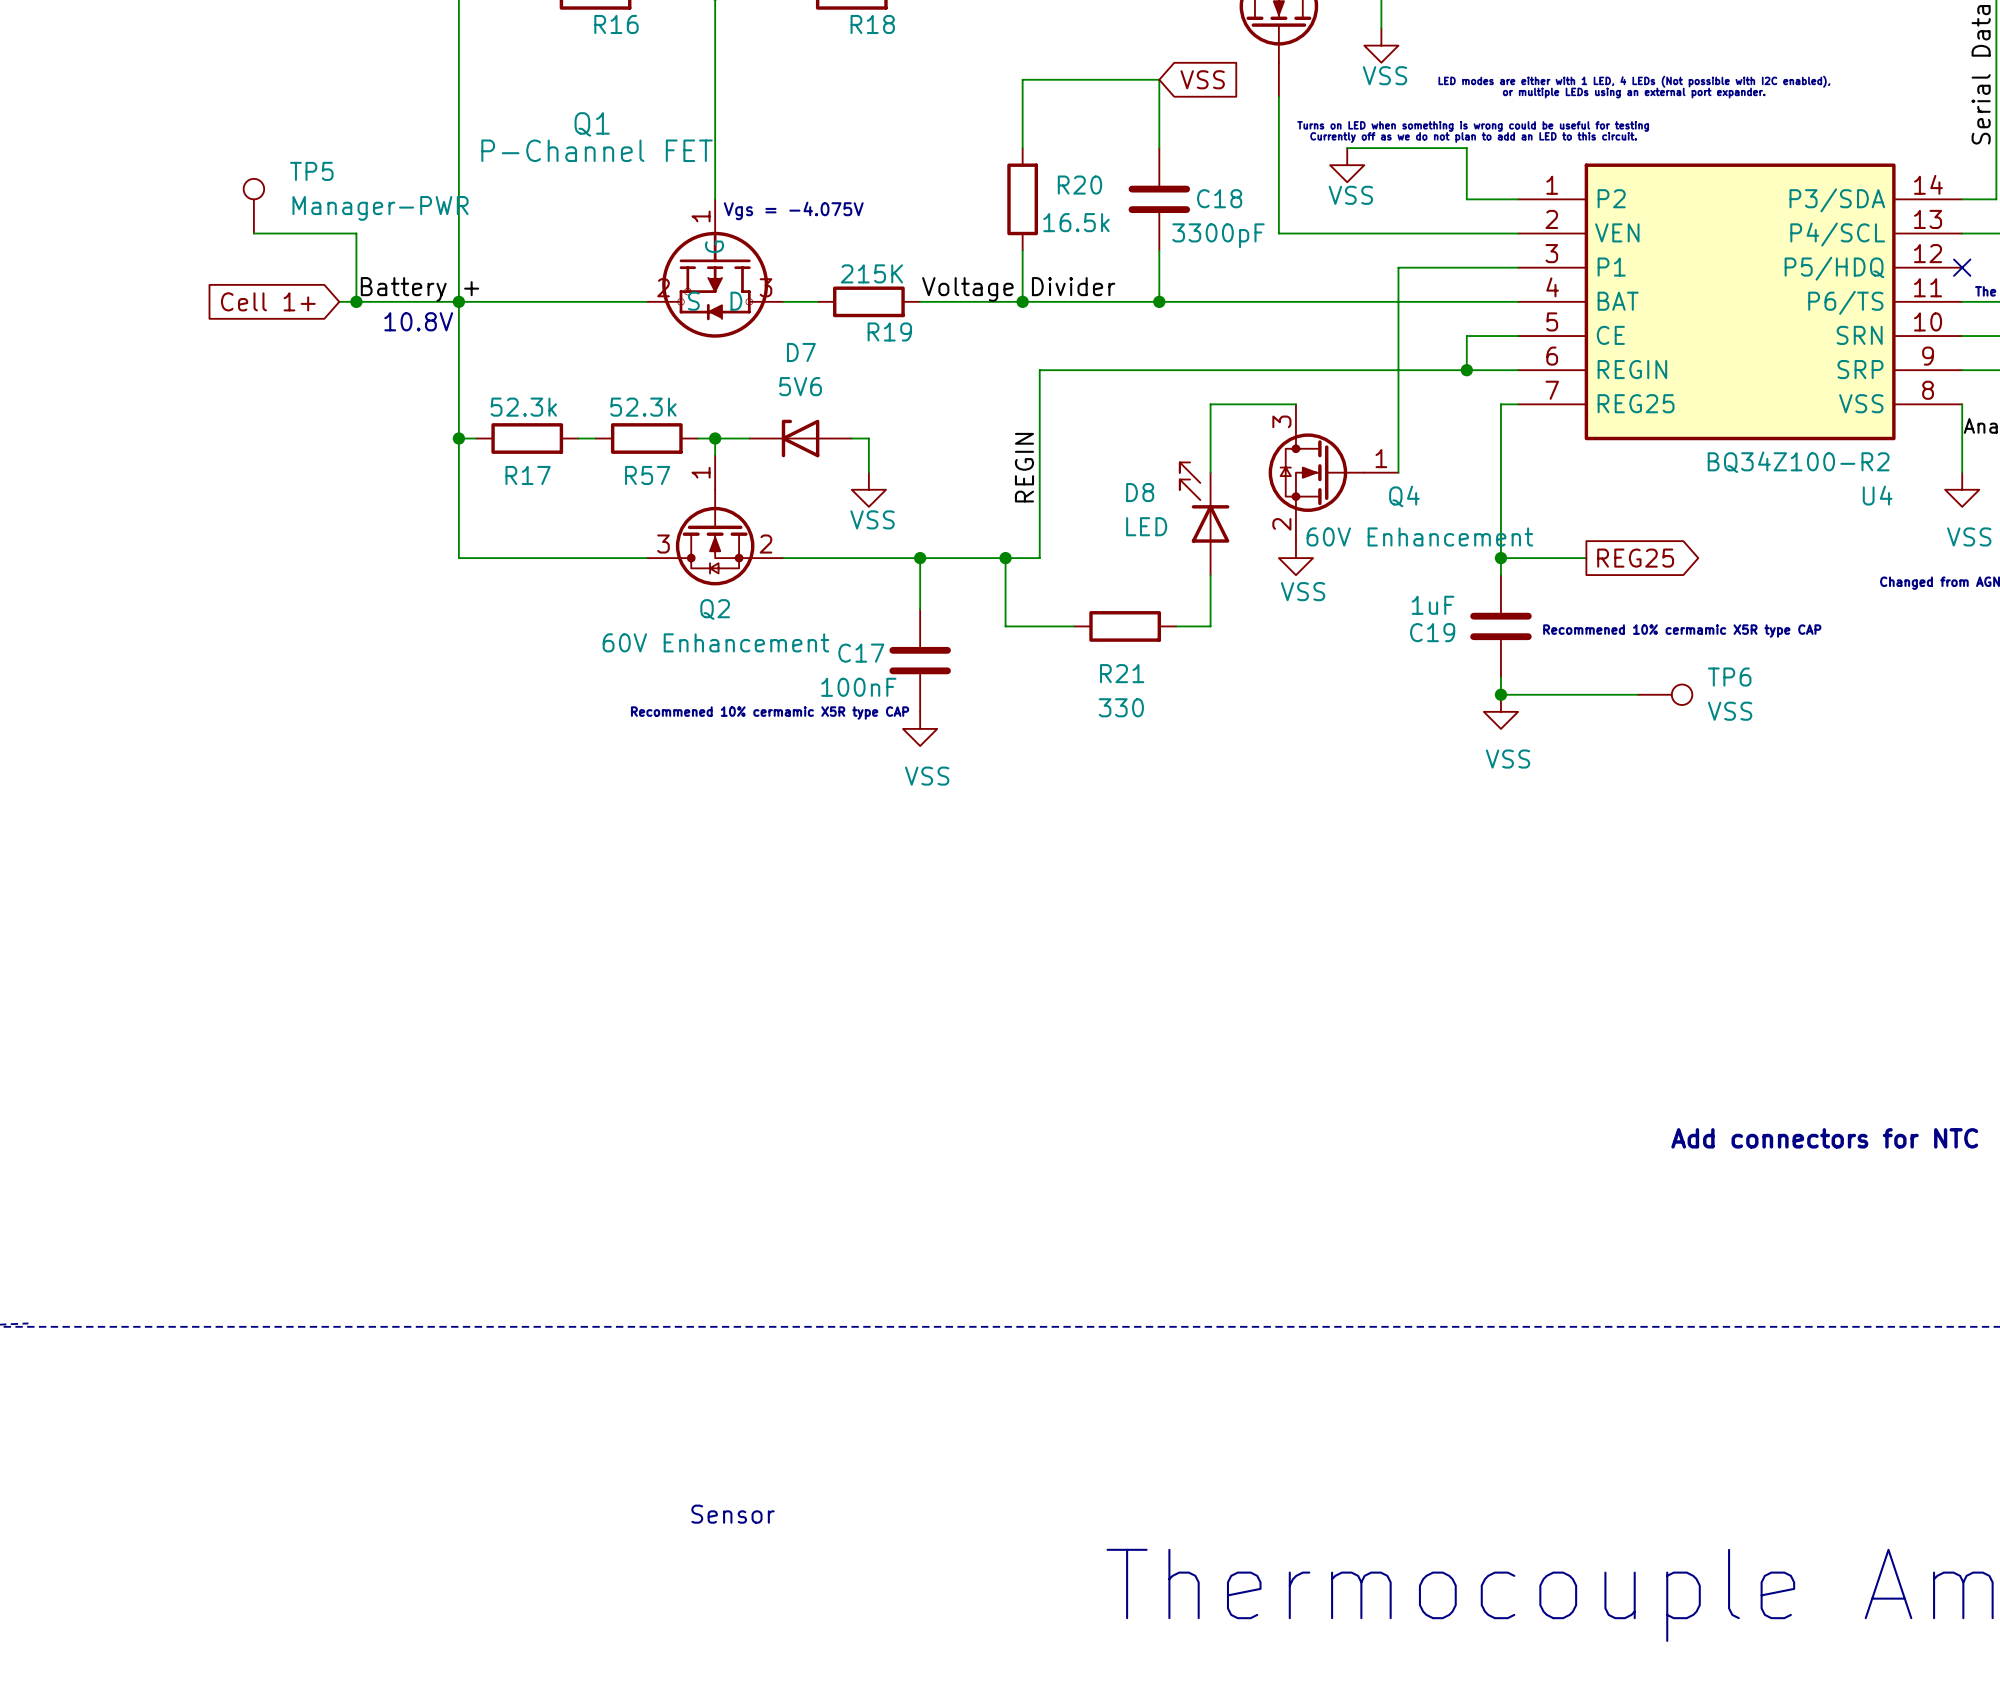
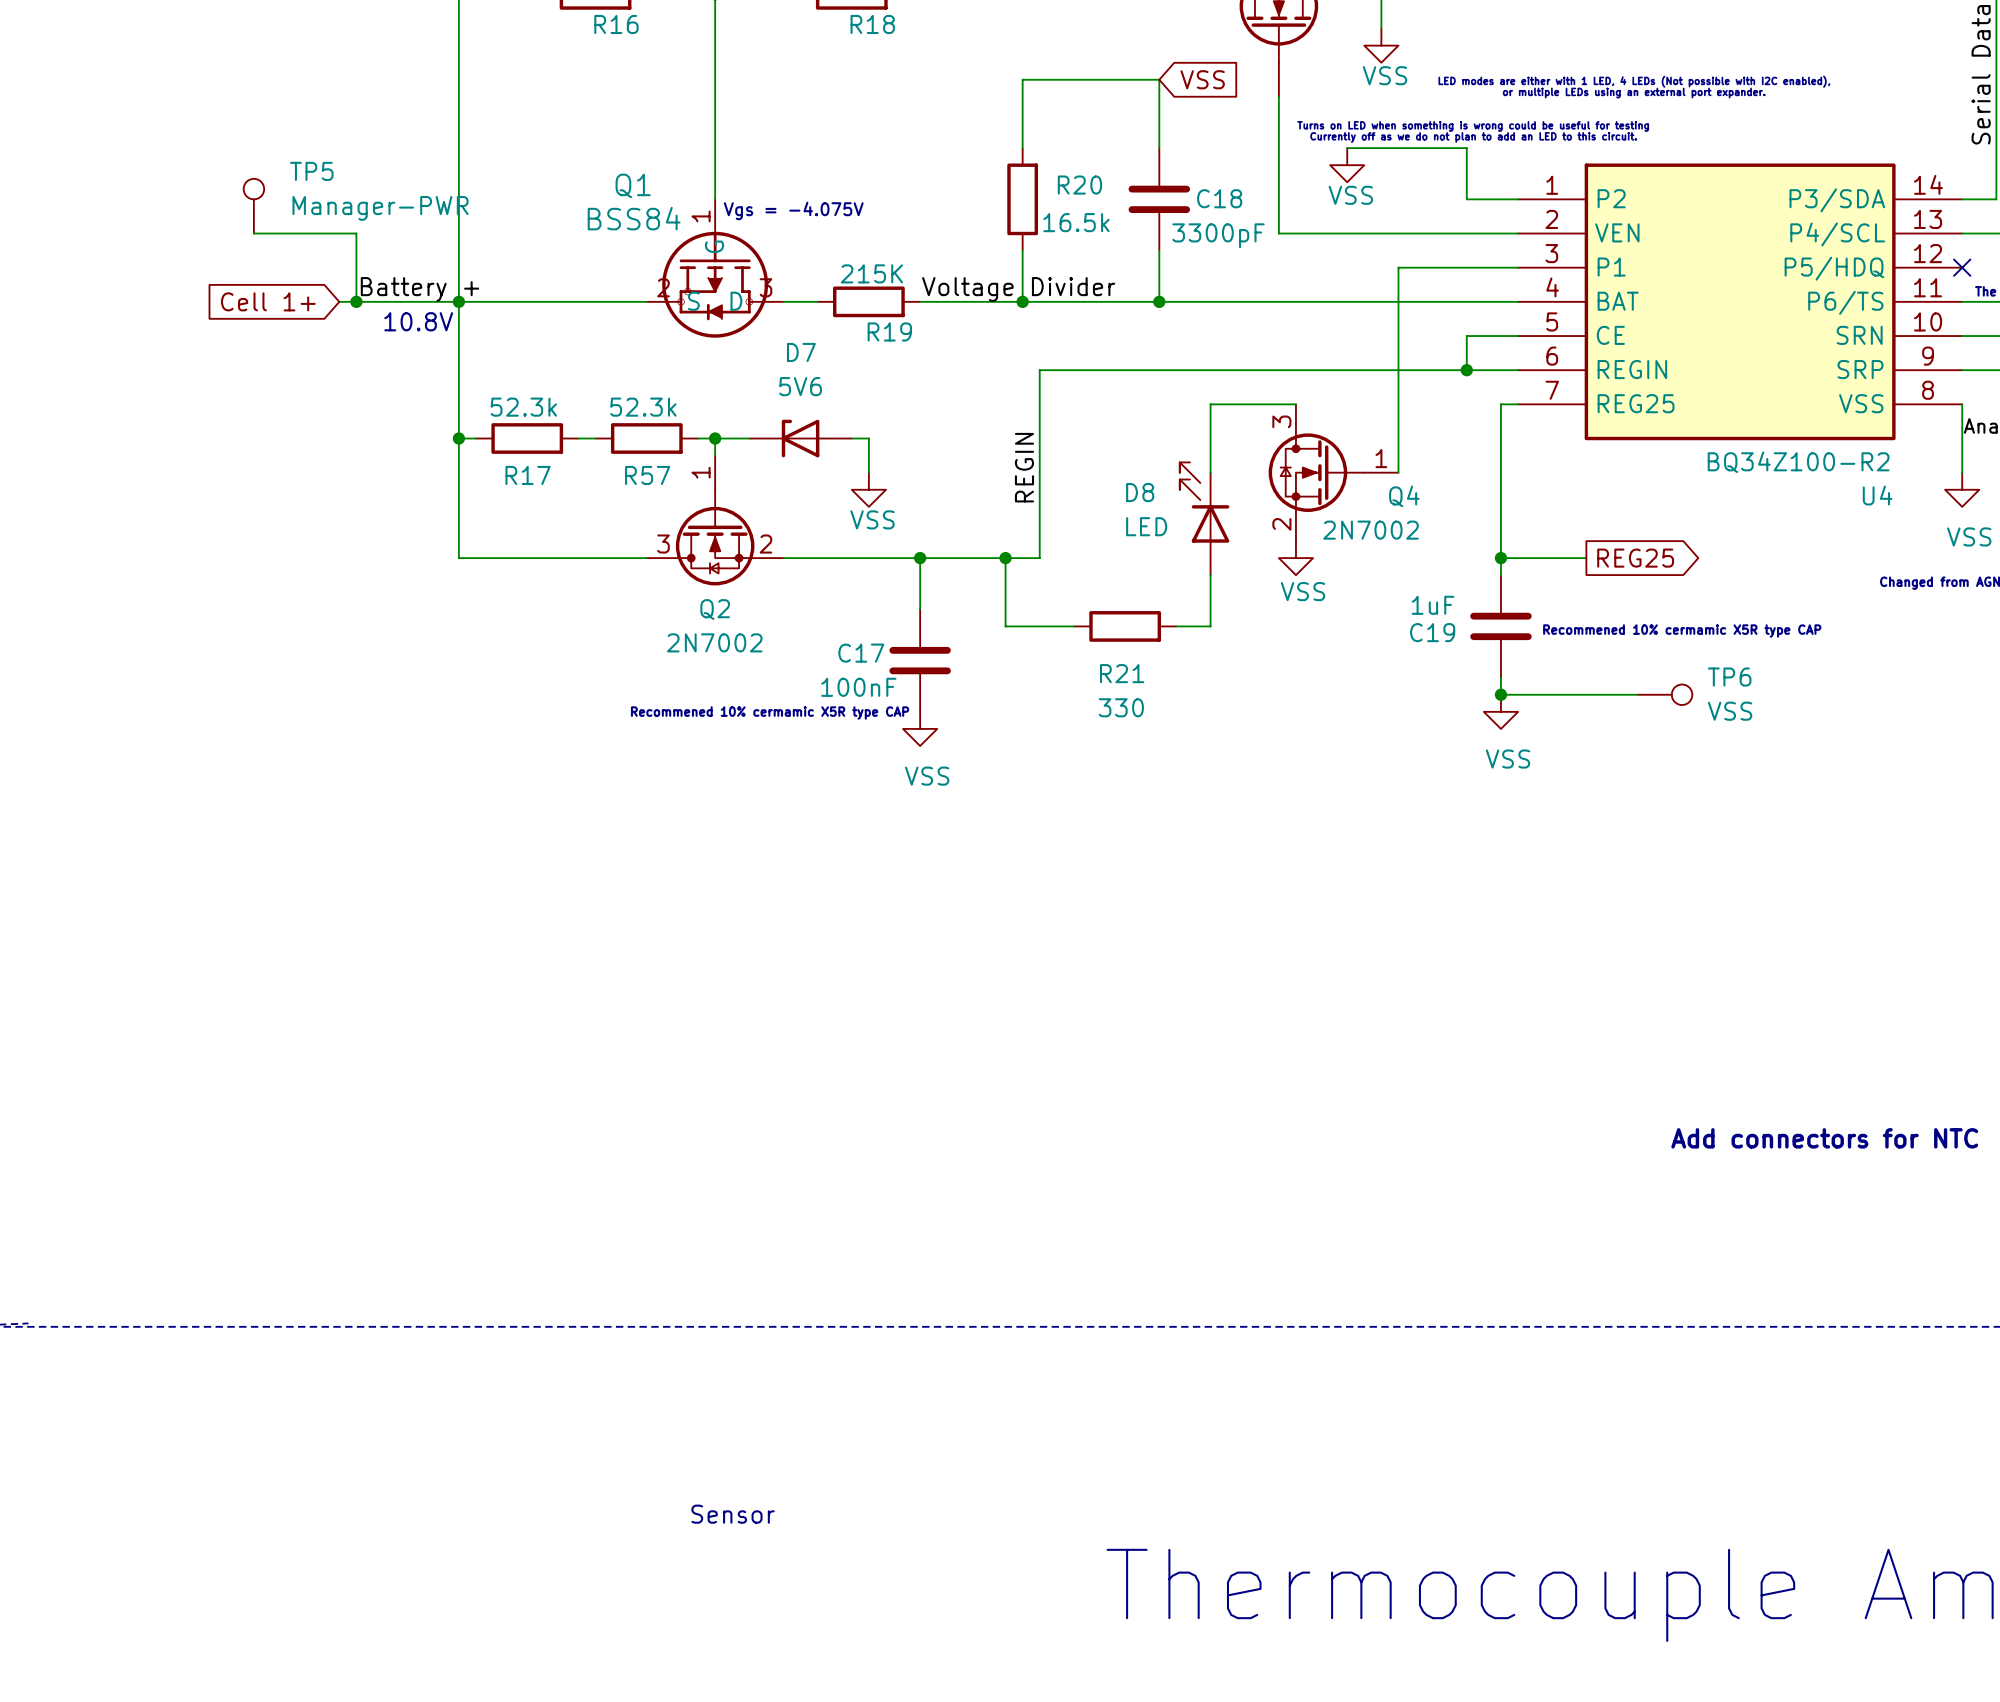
Q1 name position: Q1 (592, 124) -> Q1 (633, 185)
Q1 value: P-Channel FET (597, 150) -> BSS84 (634, 218)
Q4 value: 60V Enhancement (1419, 536) -> 2N7002 (1371, 530)
Q2 value: 60V Enhancement (715, 642) -> 2N7002 (714, 642)

